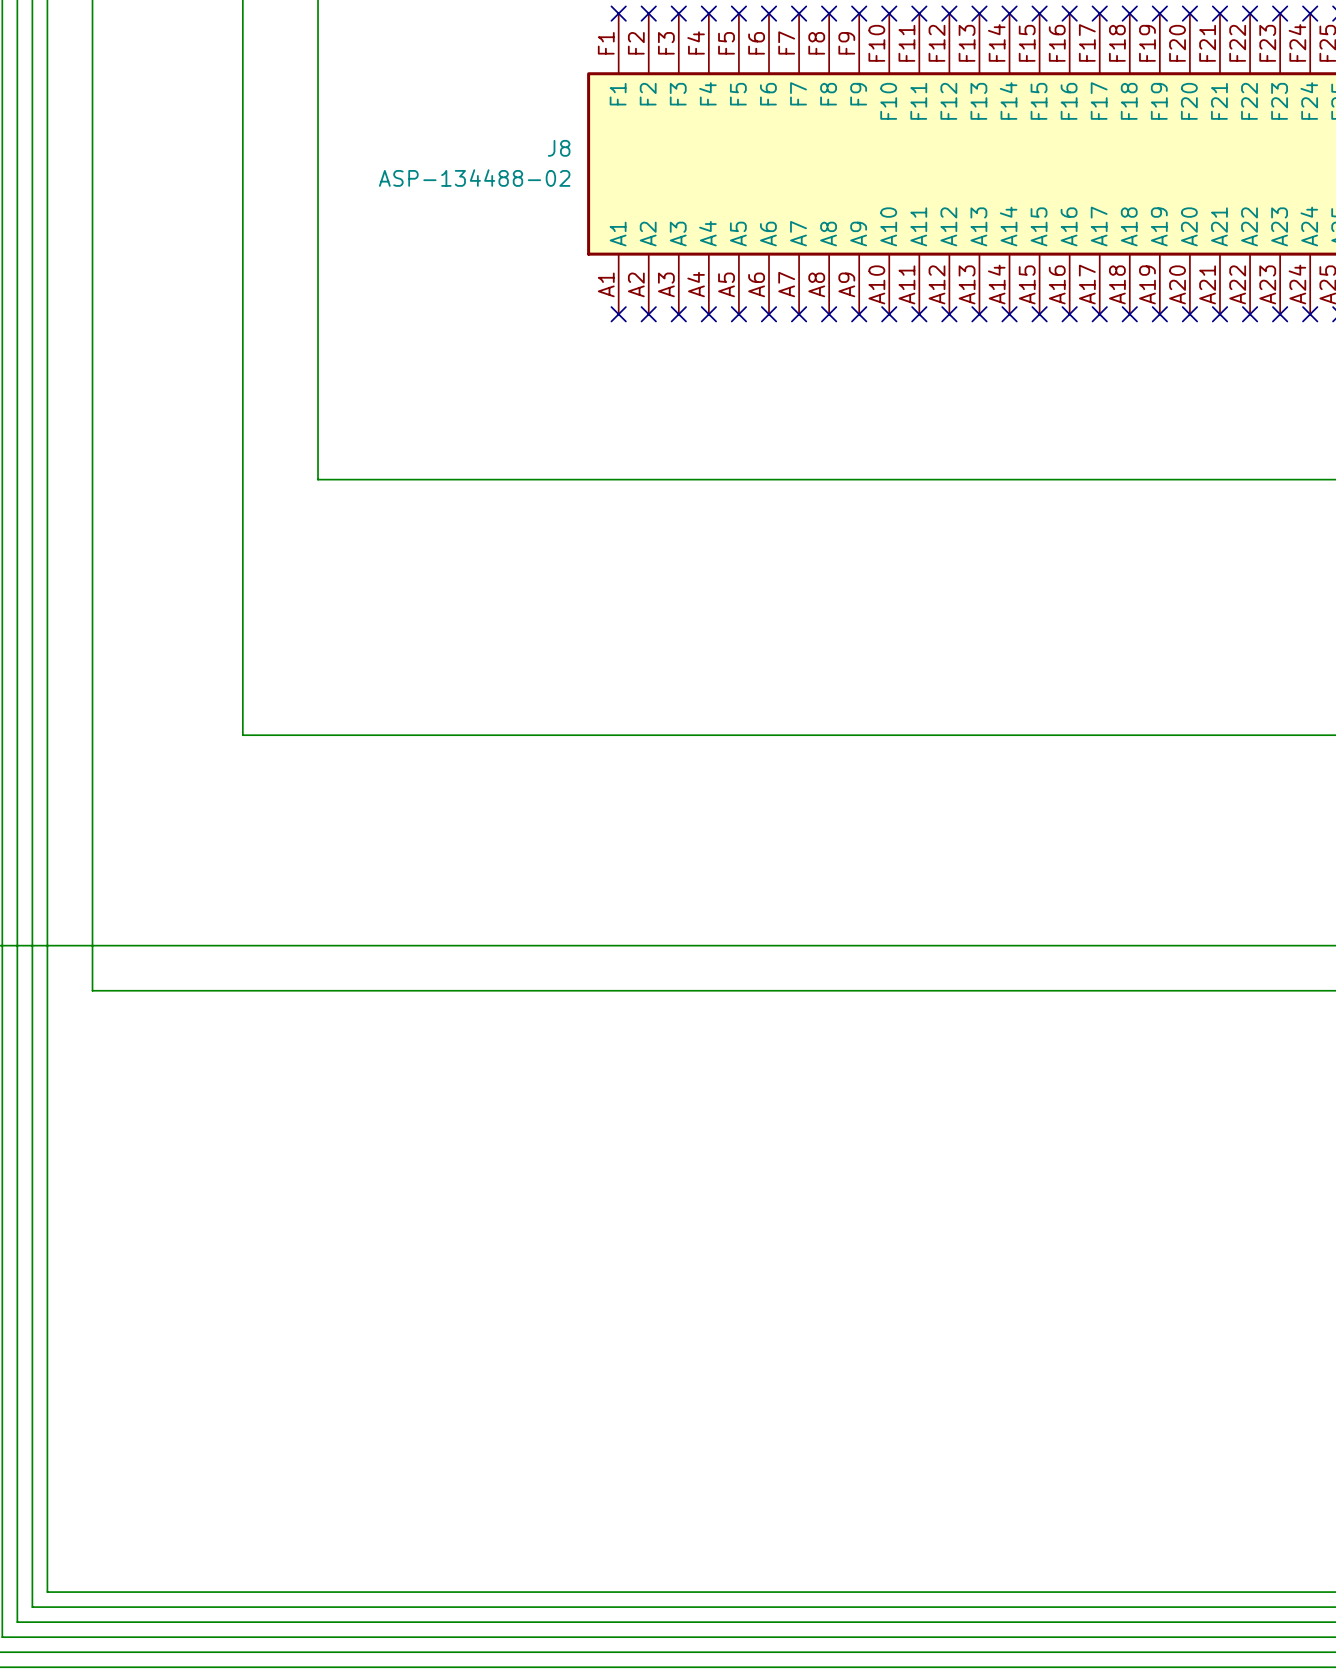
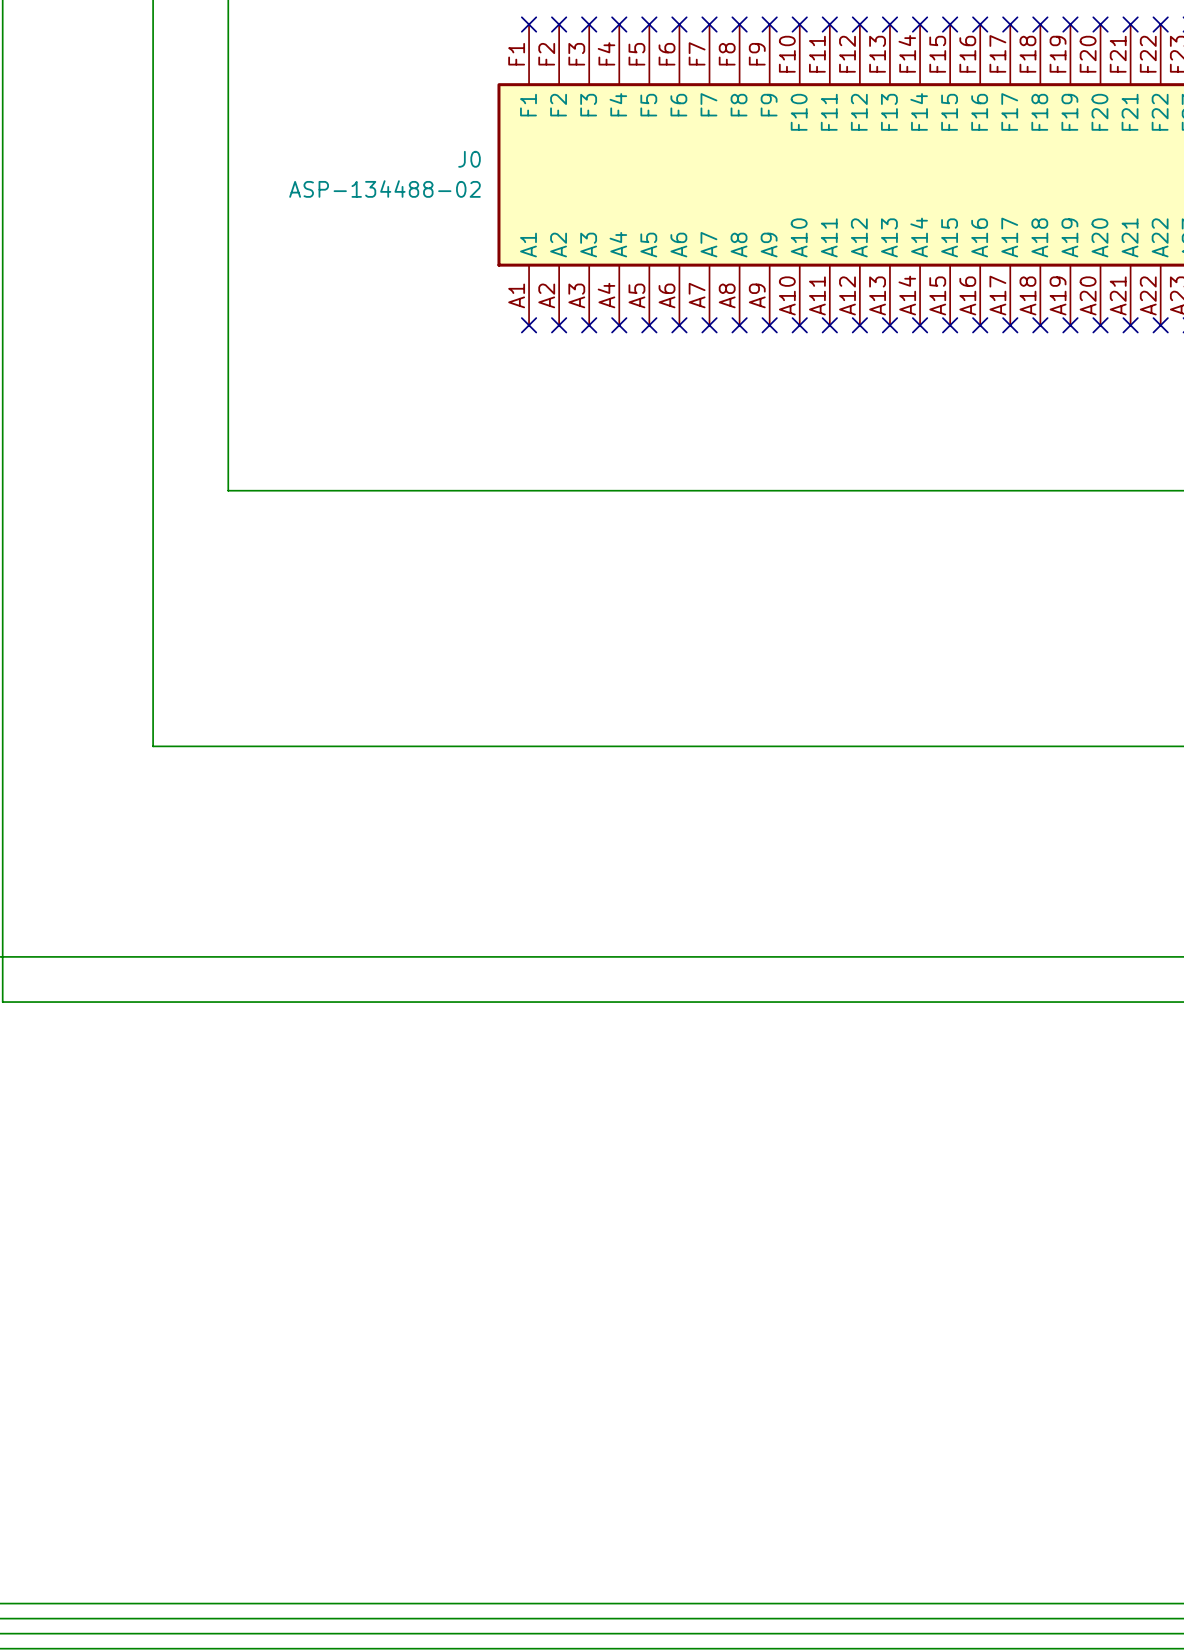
J8 name: J8 (559, 148) -> J0 (469, 159)

